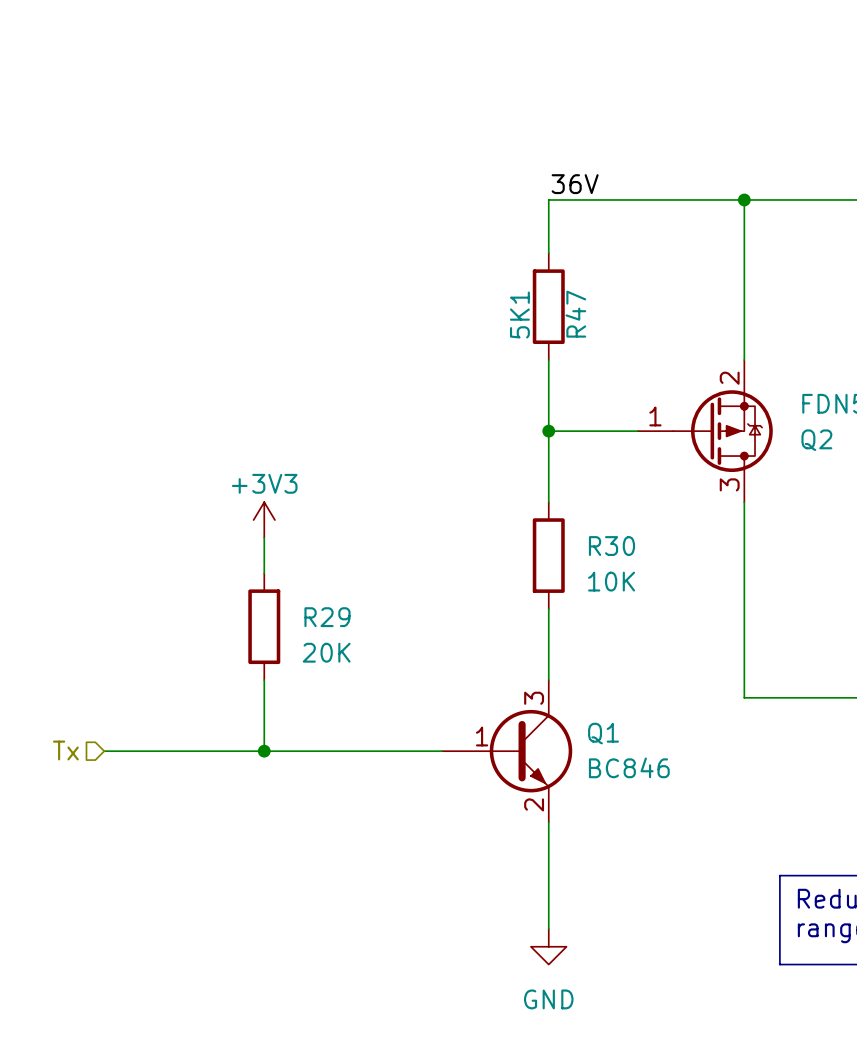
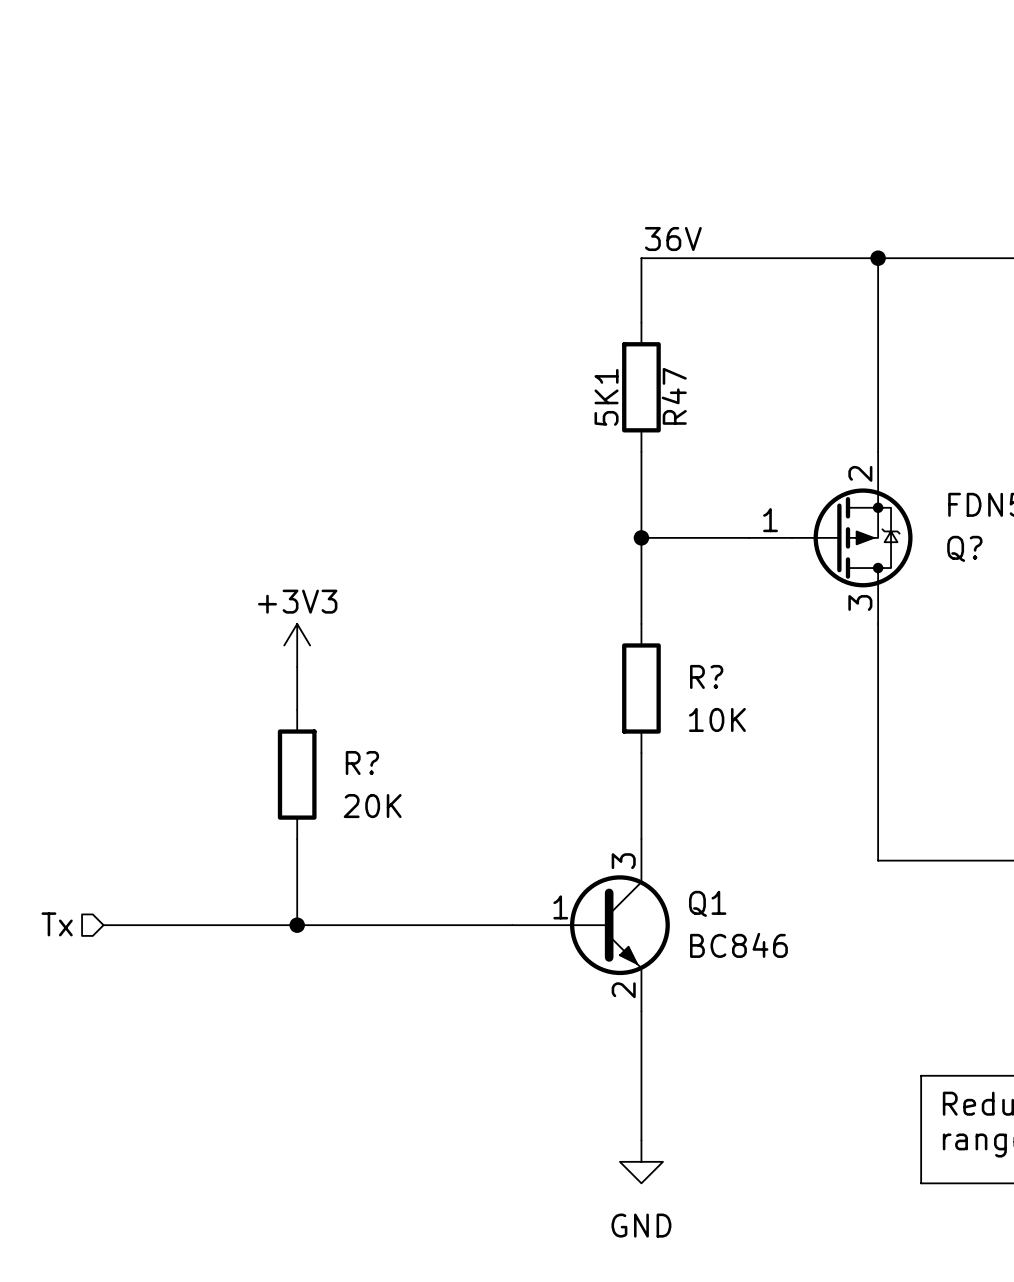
Q2 name: Q2 (816, 440) -> Q? (964, 548)
R30 name: R30 (611, 546) -> R? (706, 676)
R29 name: R29 (327, 617) -> R? (362, 763)

